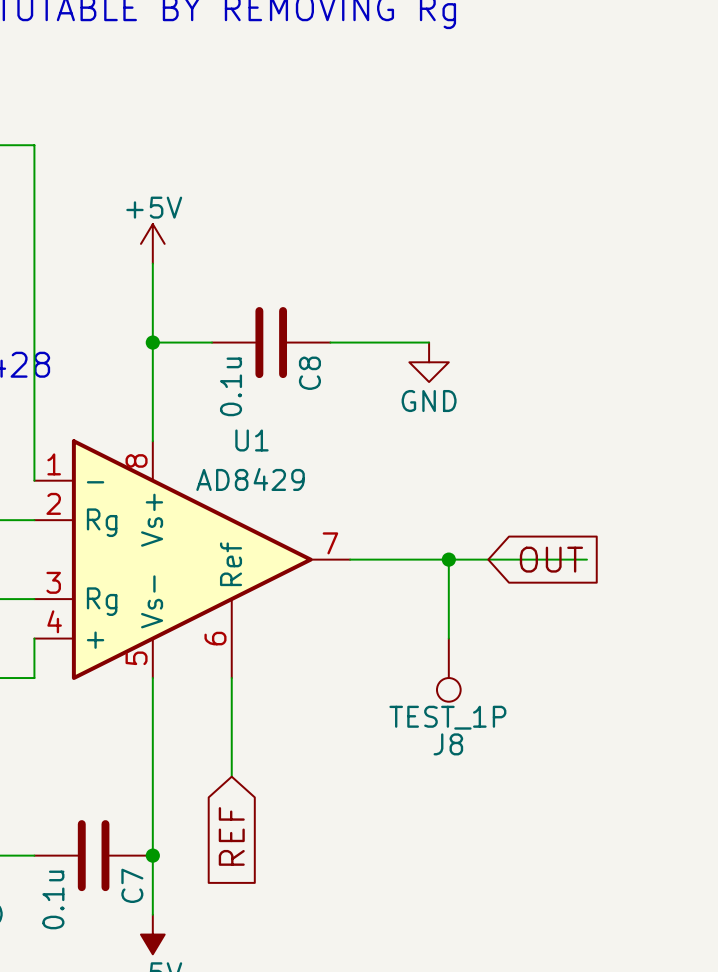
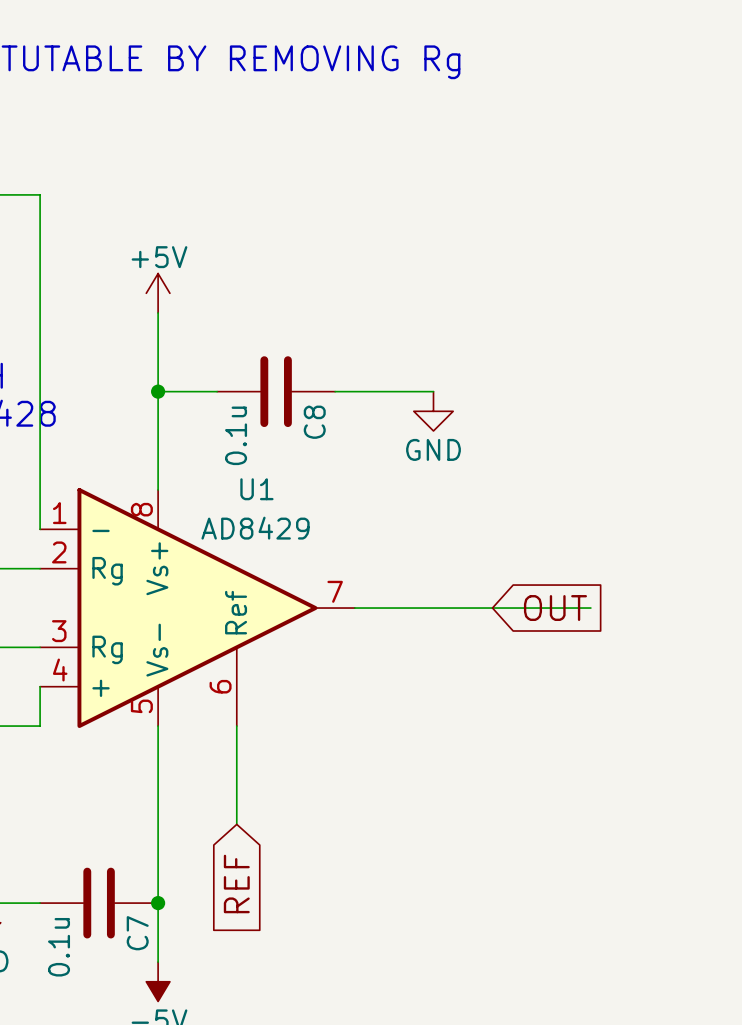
wire: (448, 559) (448, 638) -> none
junction: (448, 559) -> none
J8: TEST_1P (448, 670) -> none

